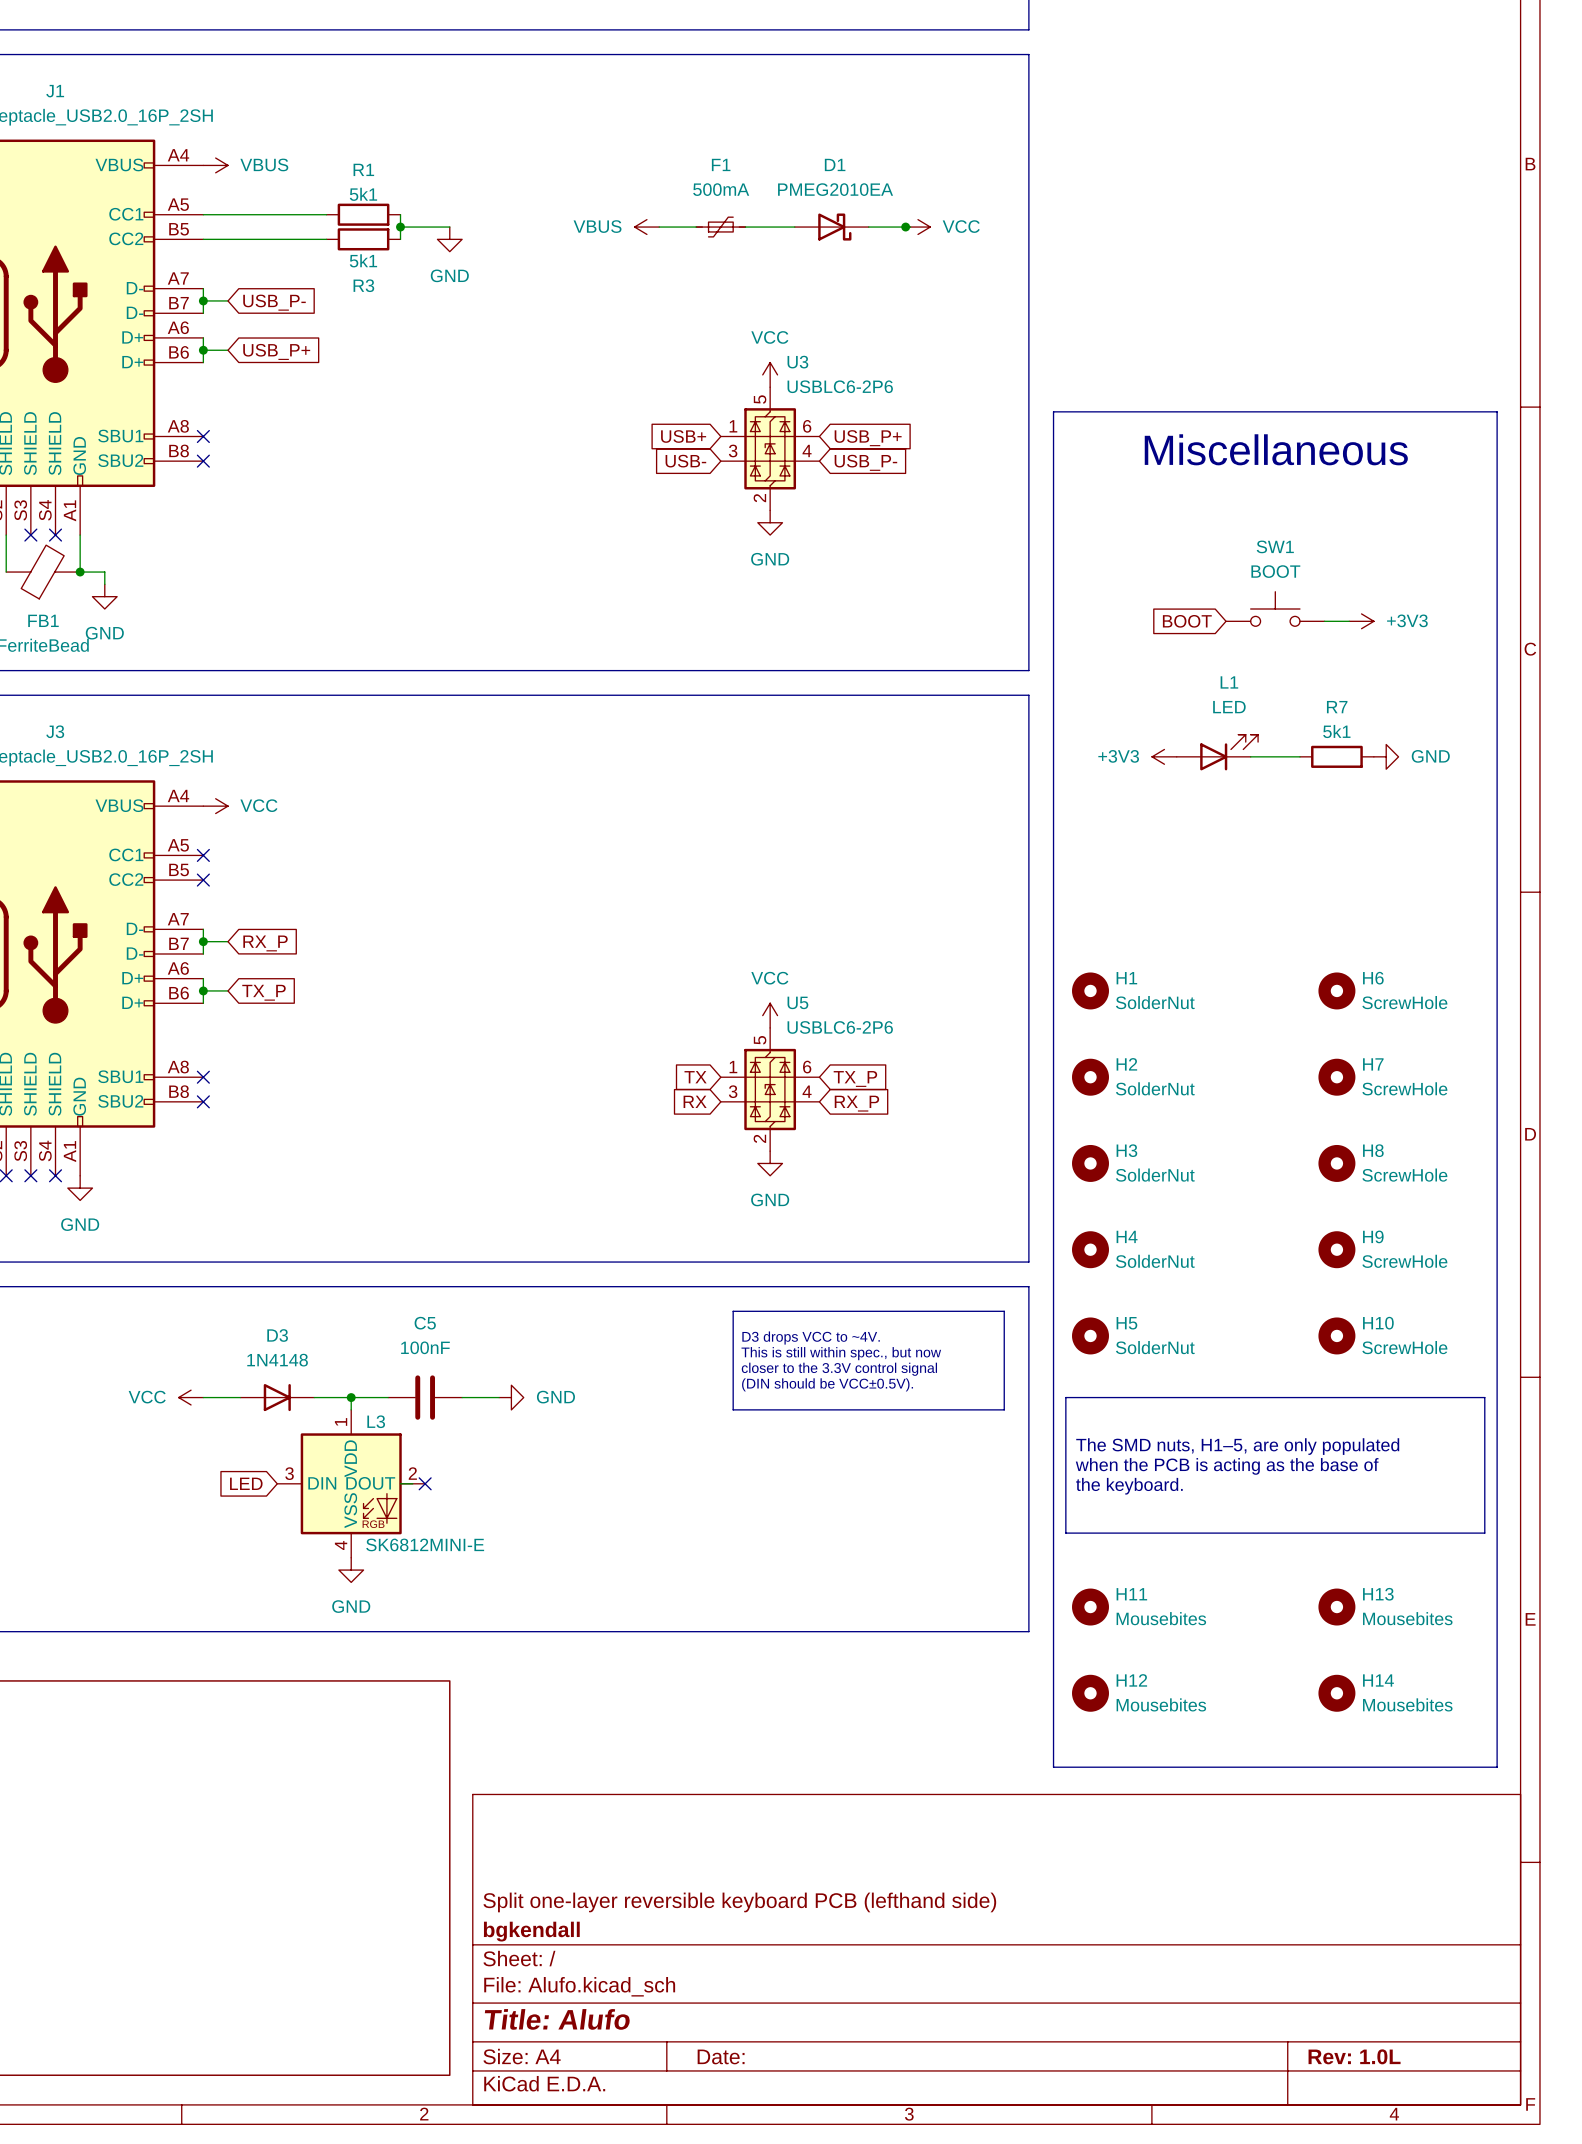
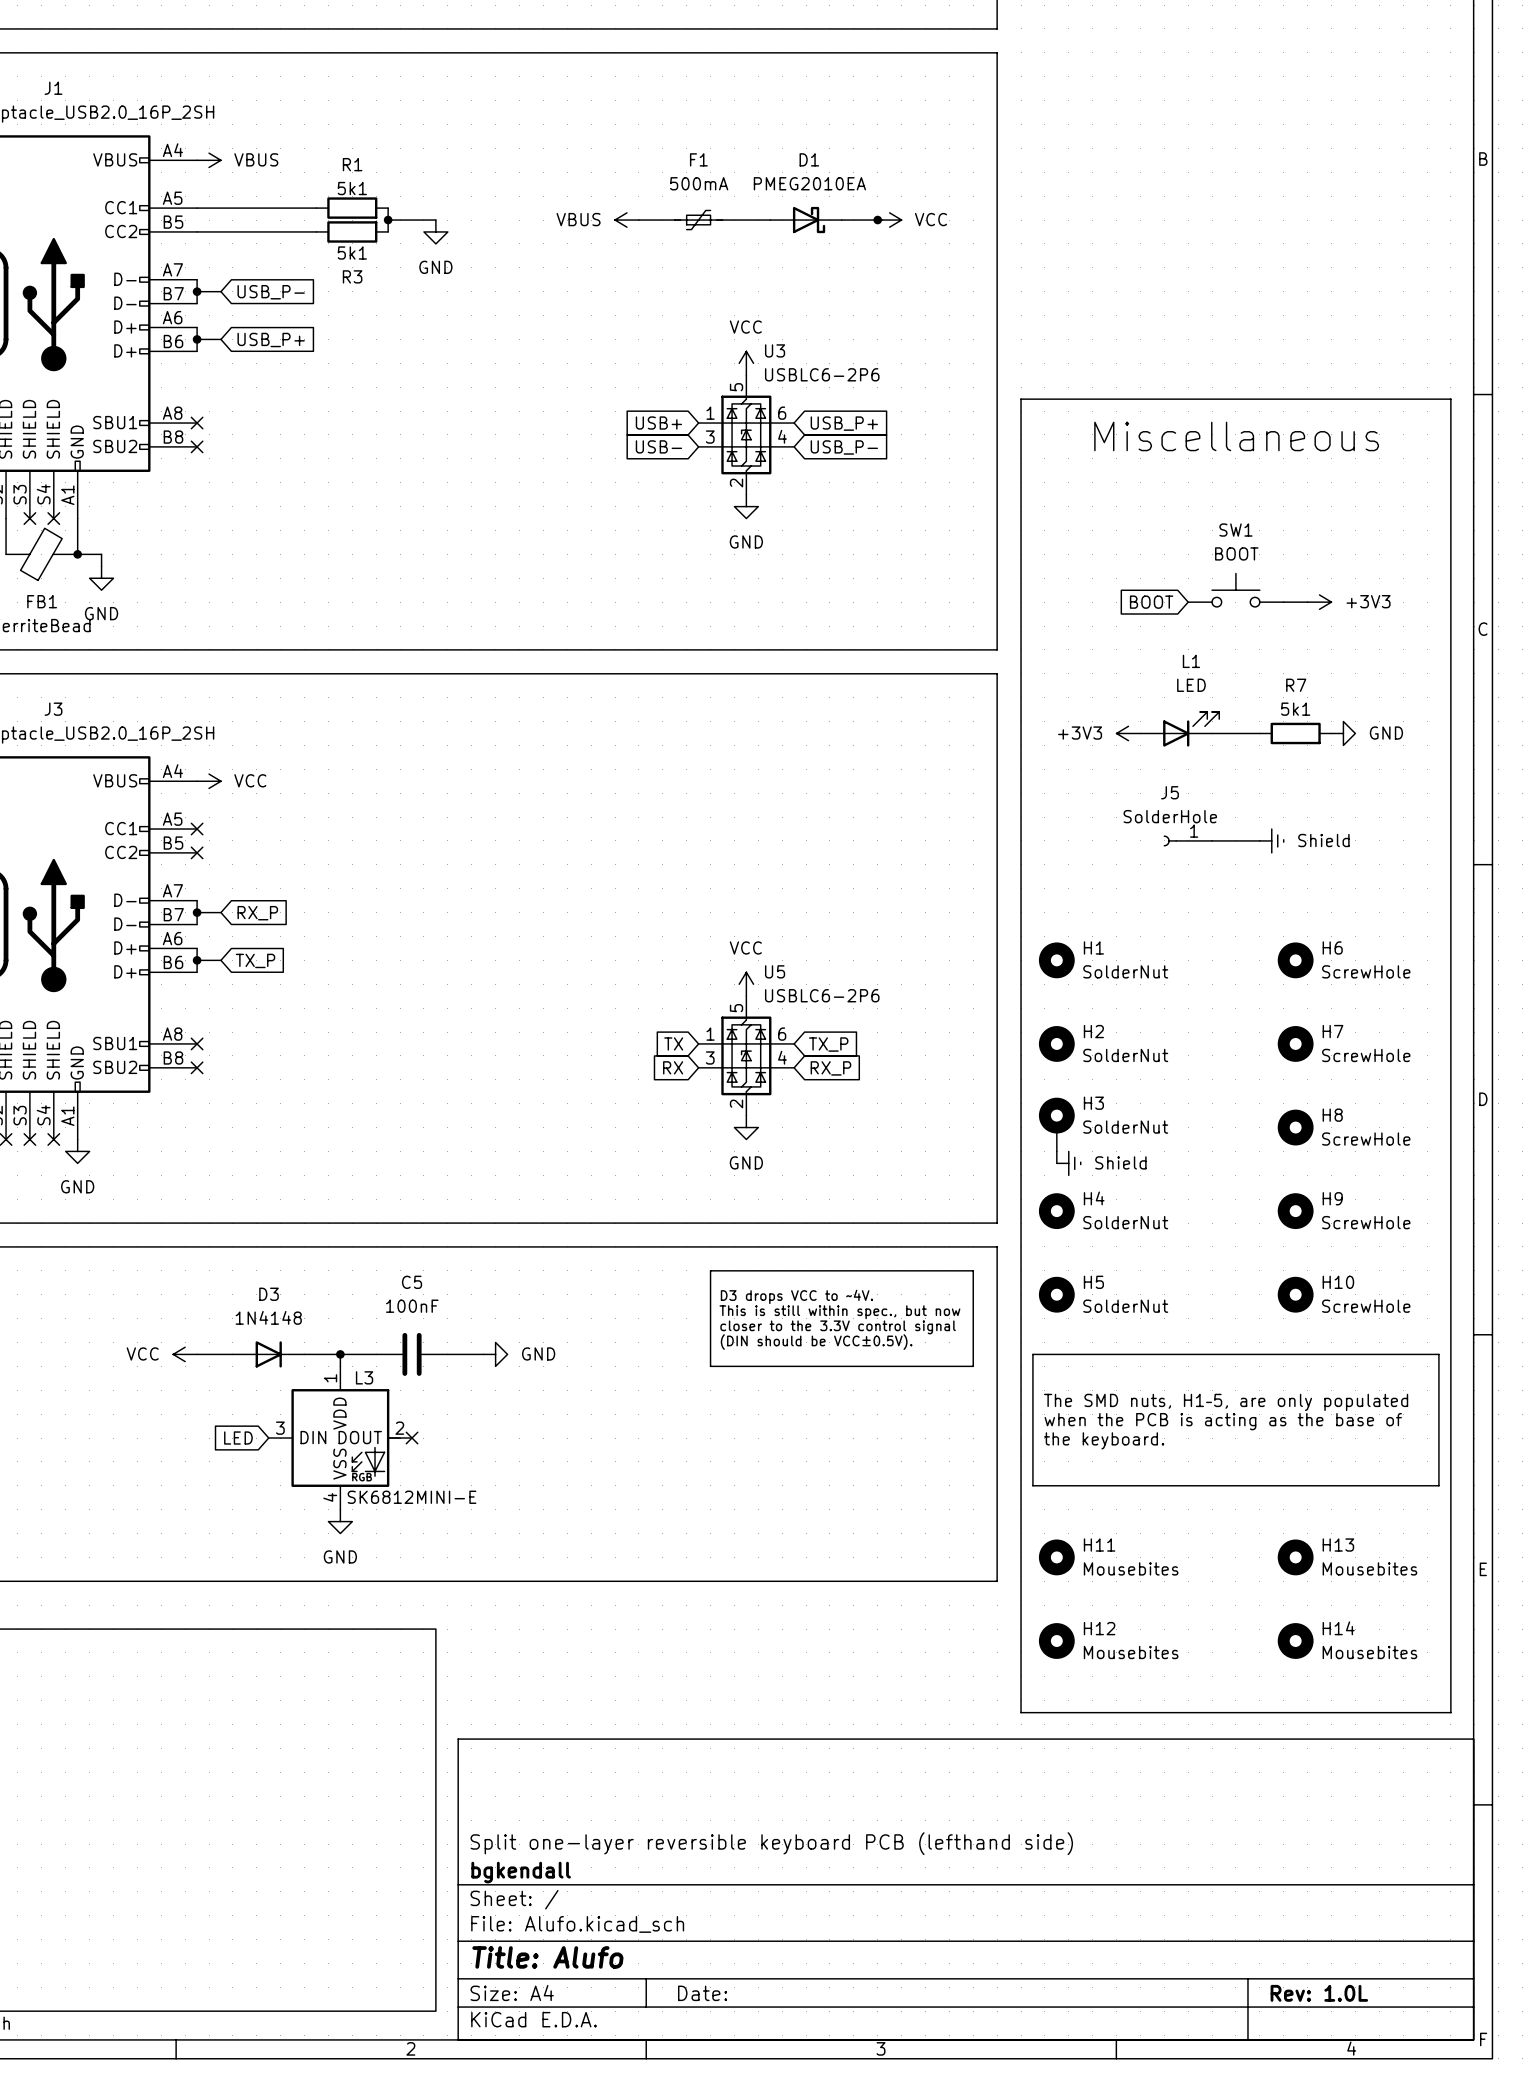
J5: none -> SolderHole (1187, 840)
wire: none -> (1212, 840) (1259, 840)
power symbol: none -> Shield (1271, 840)
H3 symbol: [1072, 1144, 1109, 1182] -> [1038, 1097, 1075, 1152]
wire: none -> (1056, 1151) (1056, 1163)
power symbol: none -> Shield (1068, 1163)

